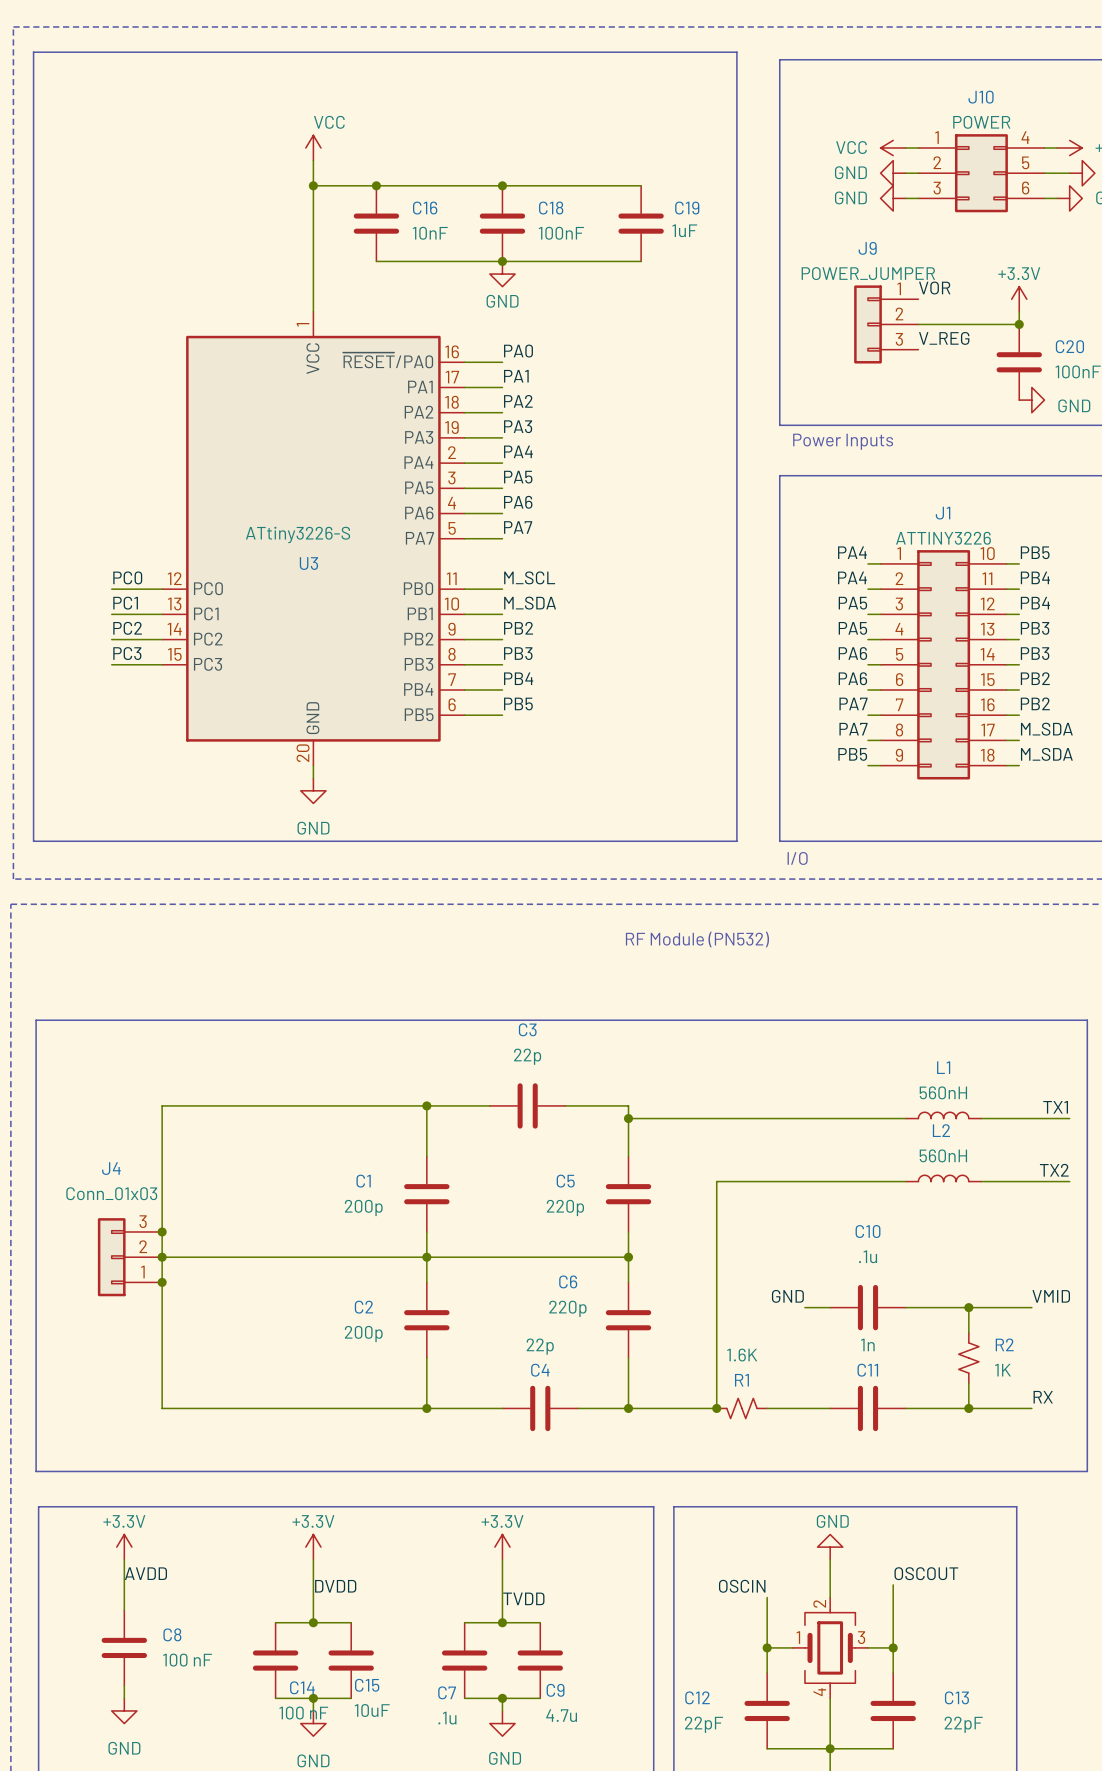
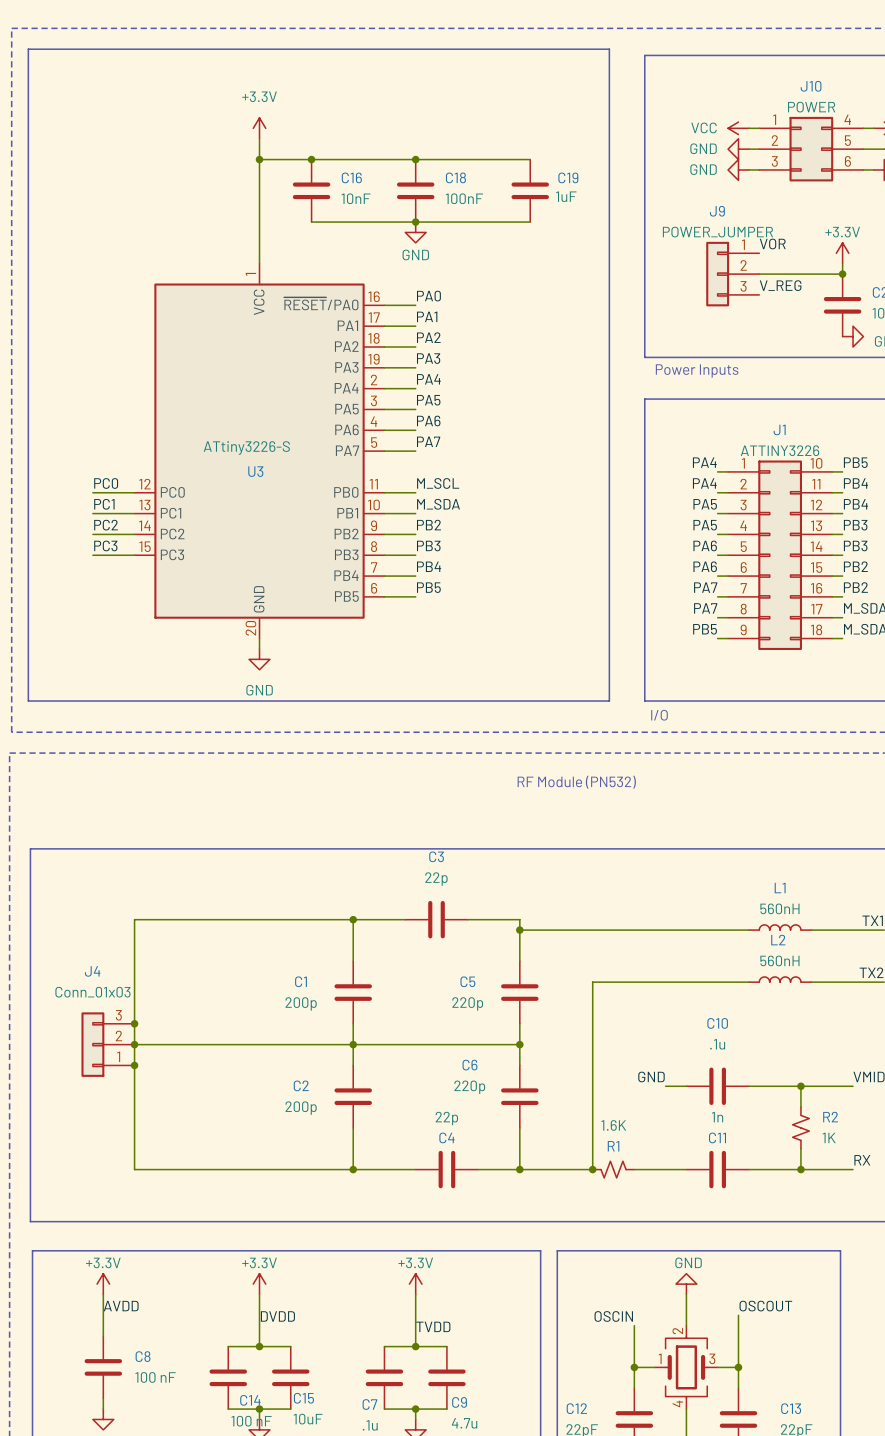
power symbol: VCC (313, 148) -> +3.3V (259, 128)

